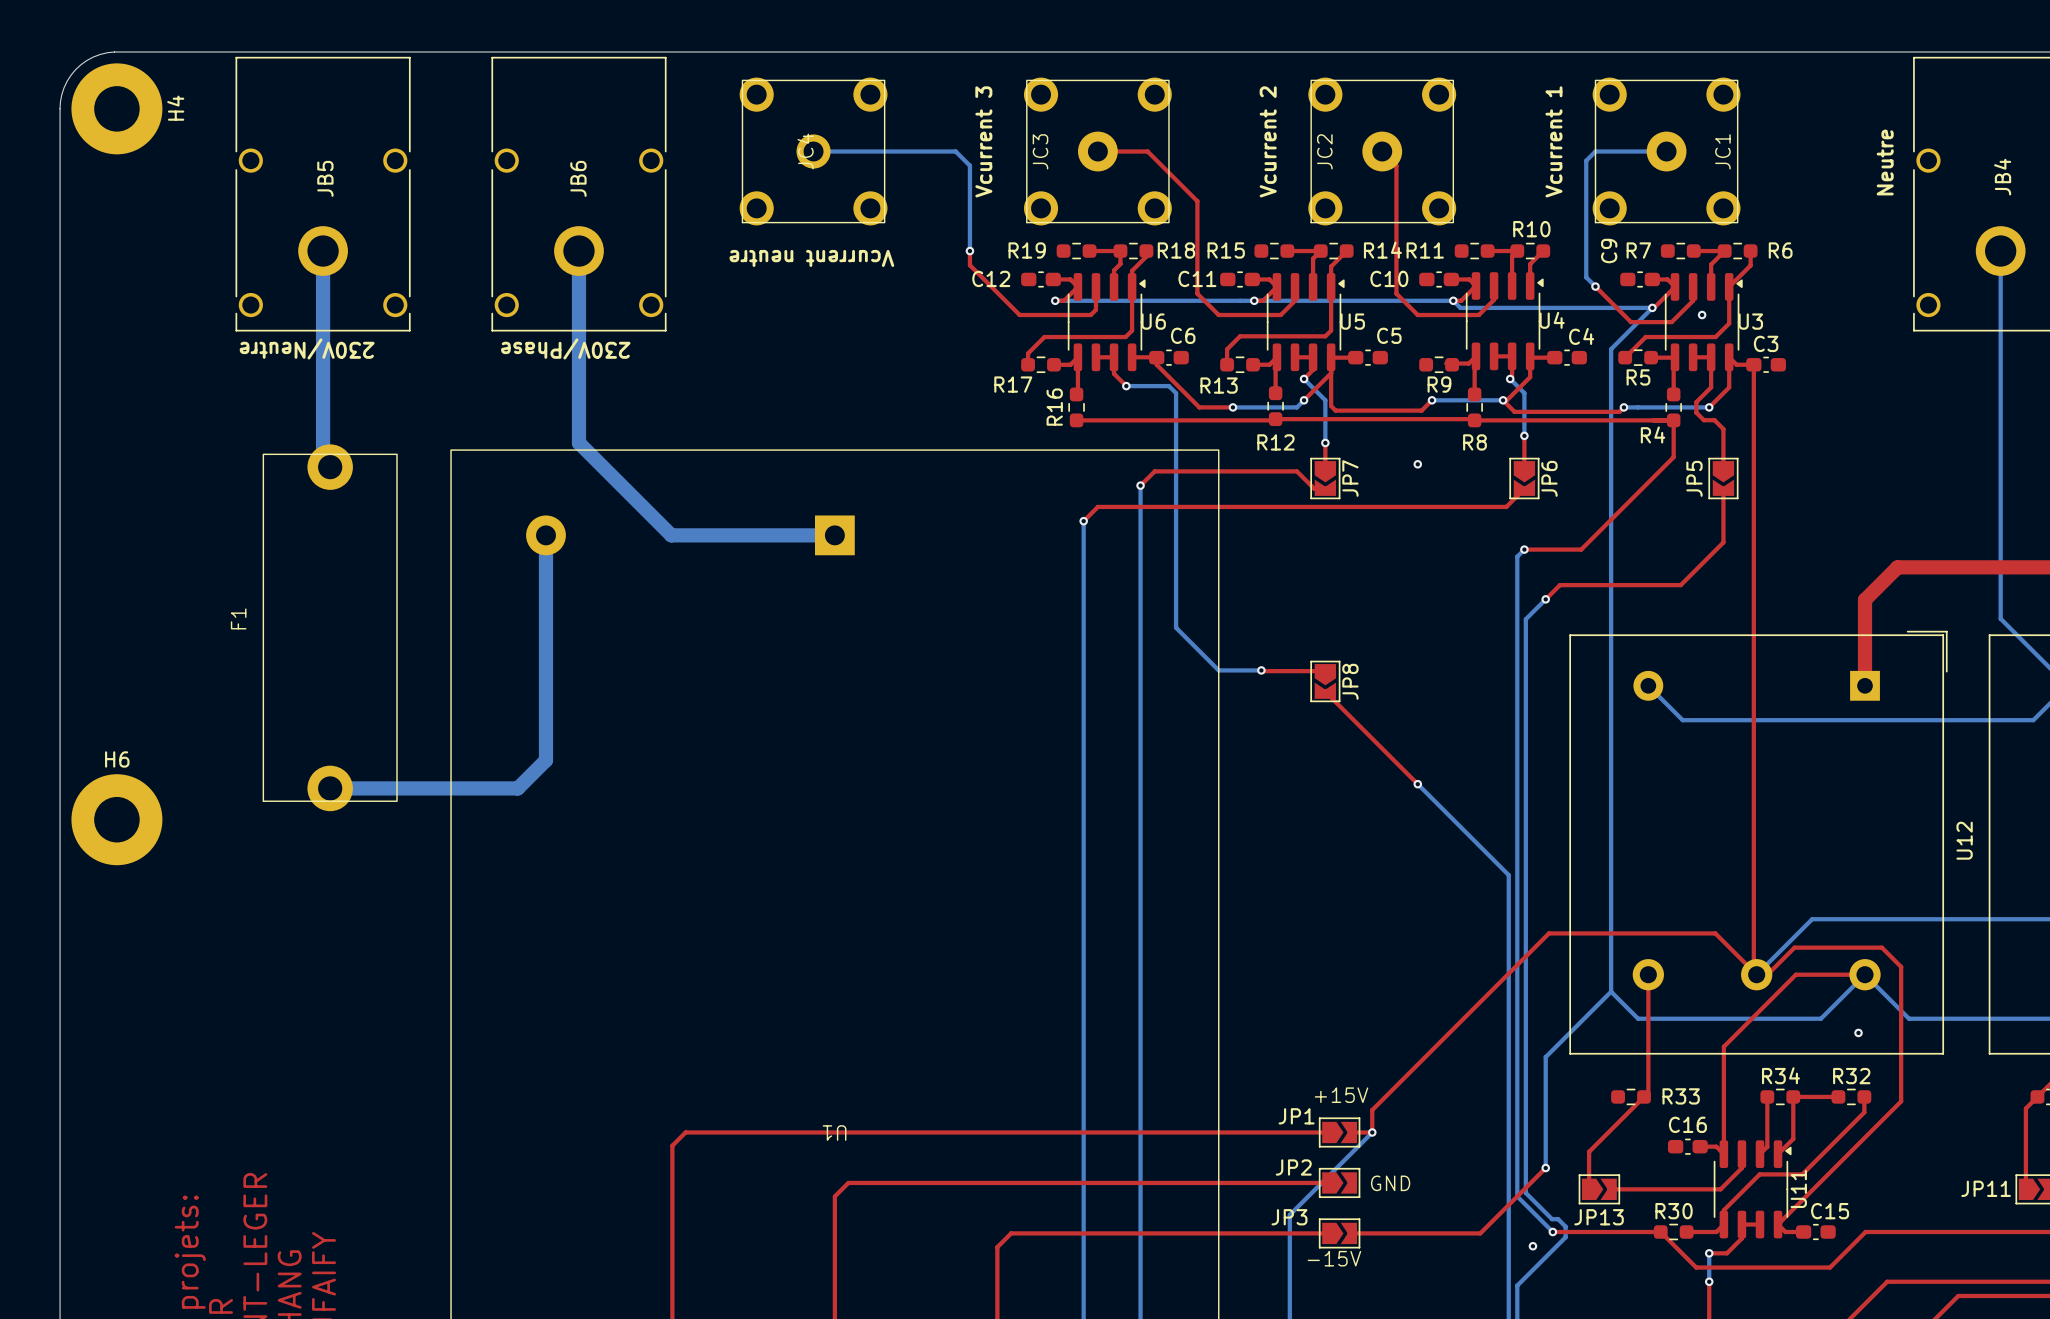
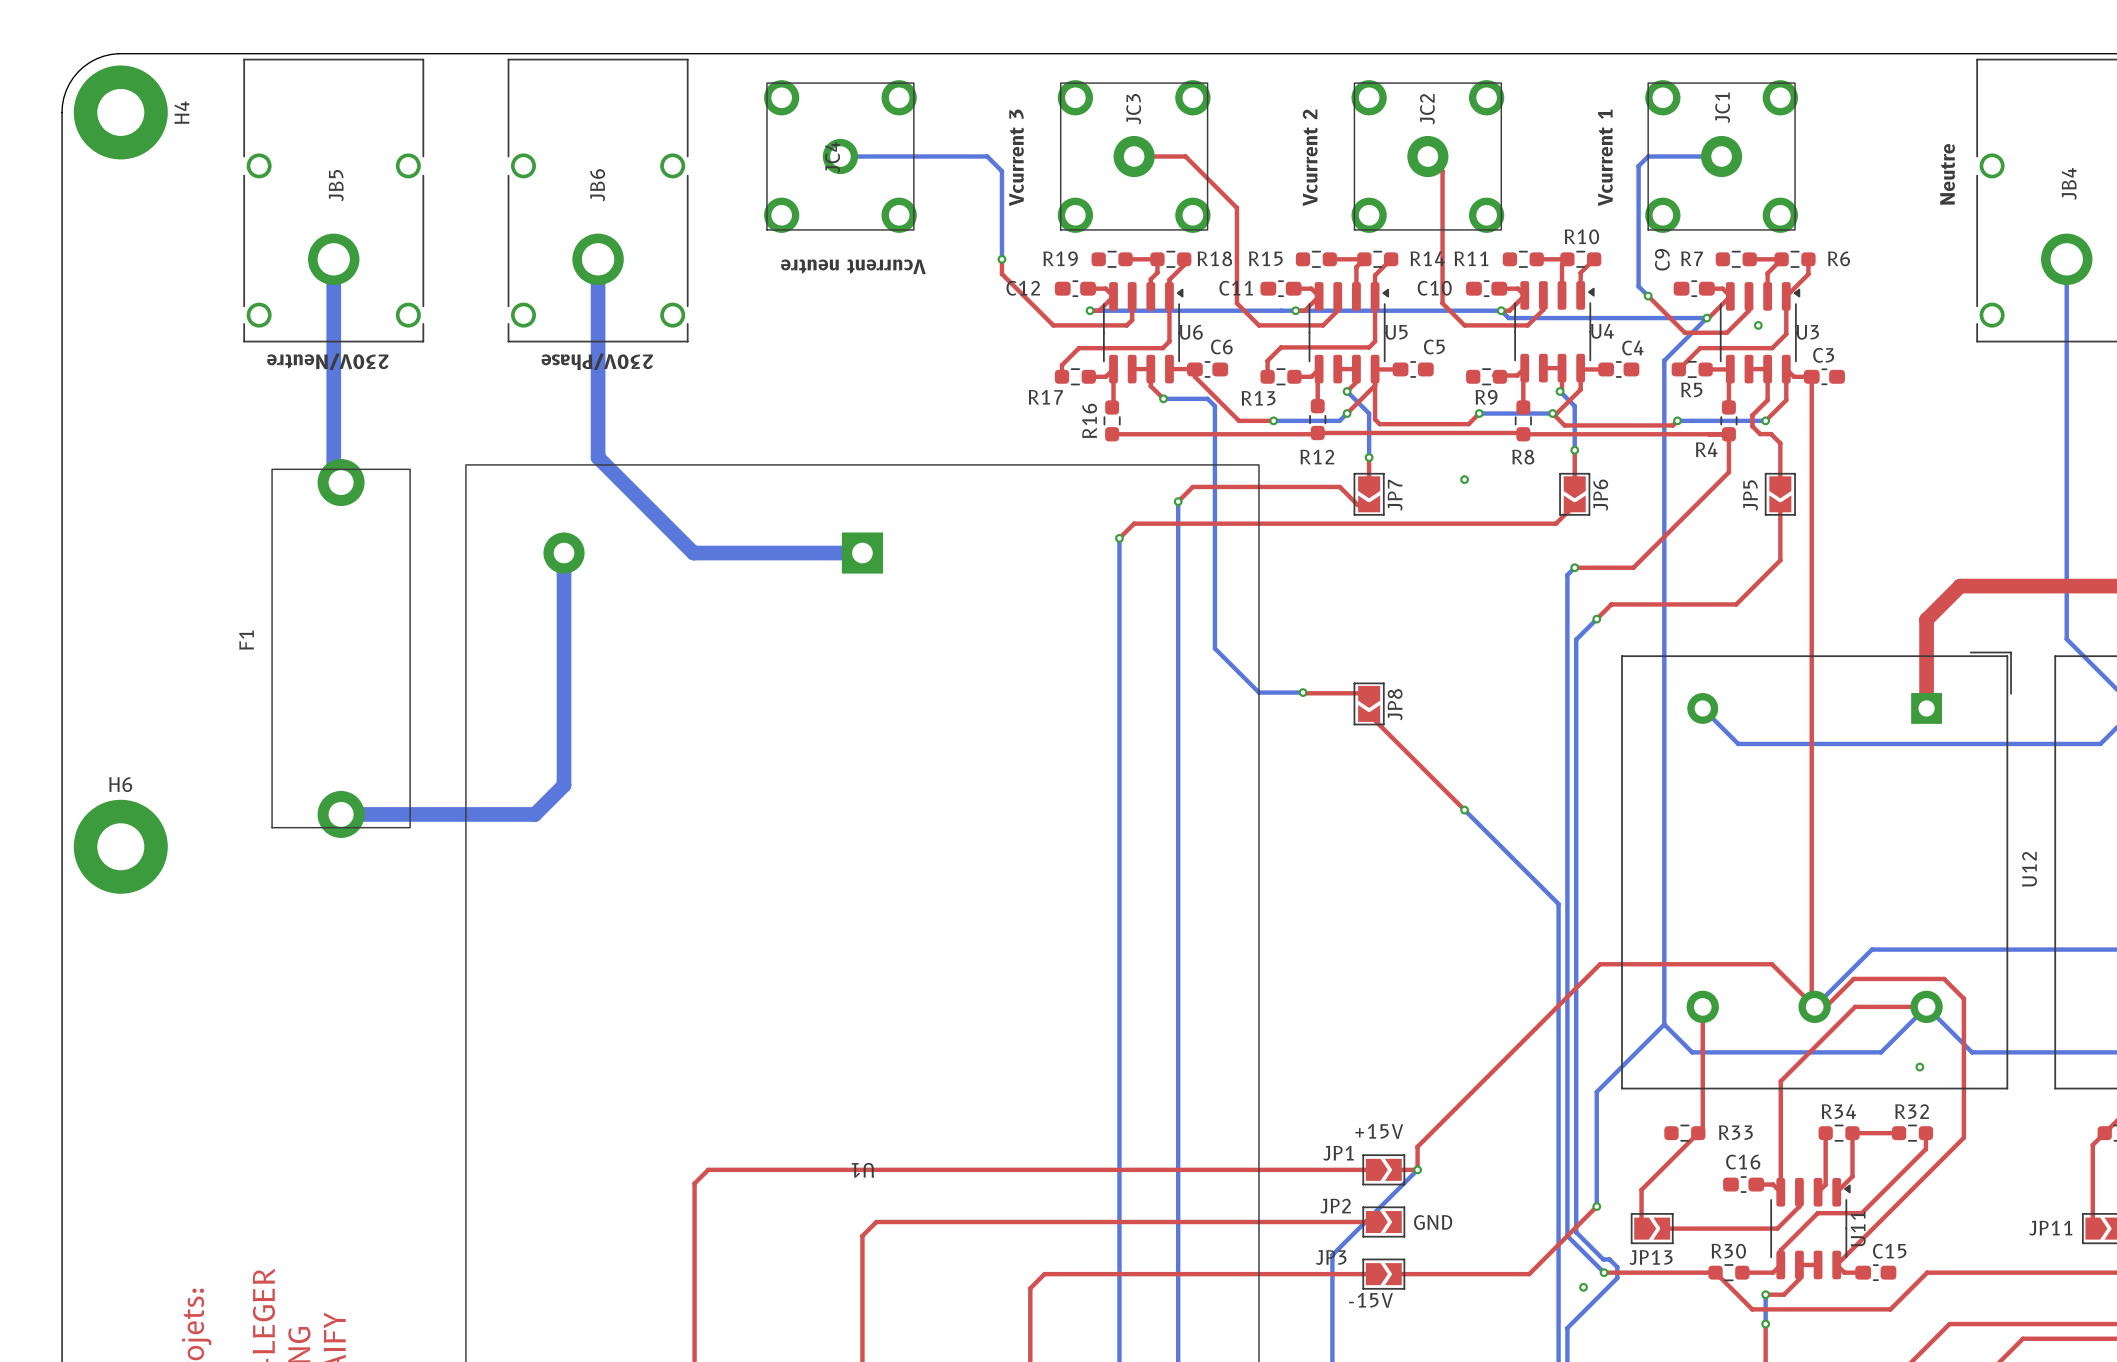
JC3 name position: JC3 (1040, 151) -> JC3 (1133, 109)
JC2 name position: JC2 (1324, 151) -> JC2 (1427, 109)
JC1 name position: JC1 (1722, 151) -> JC1 (1722, 107)

